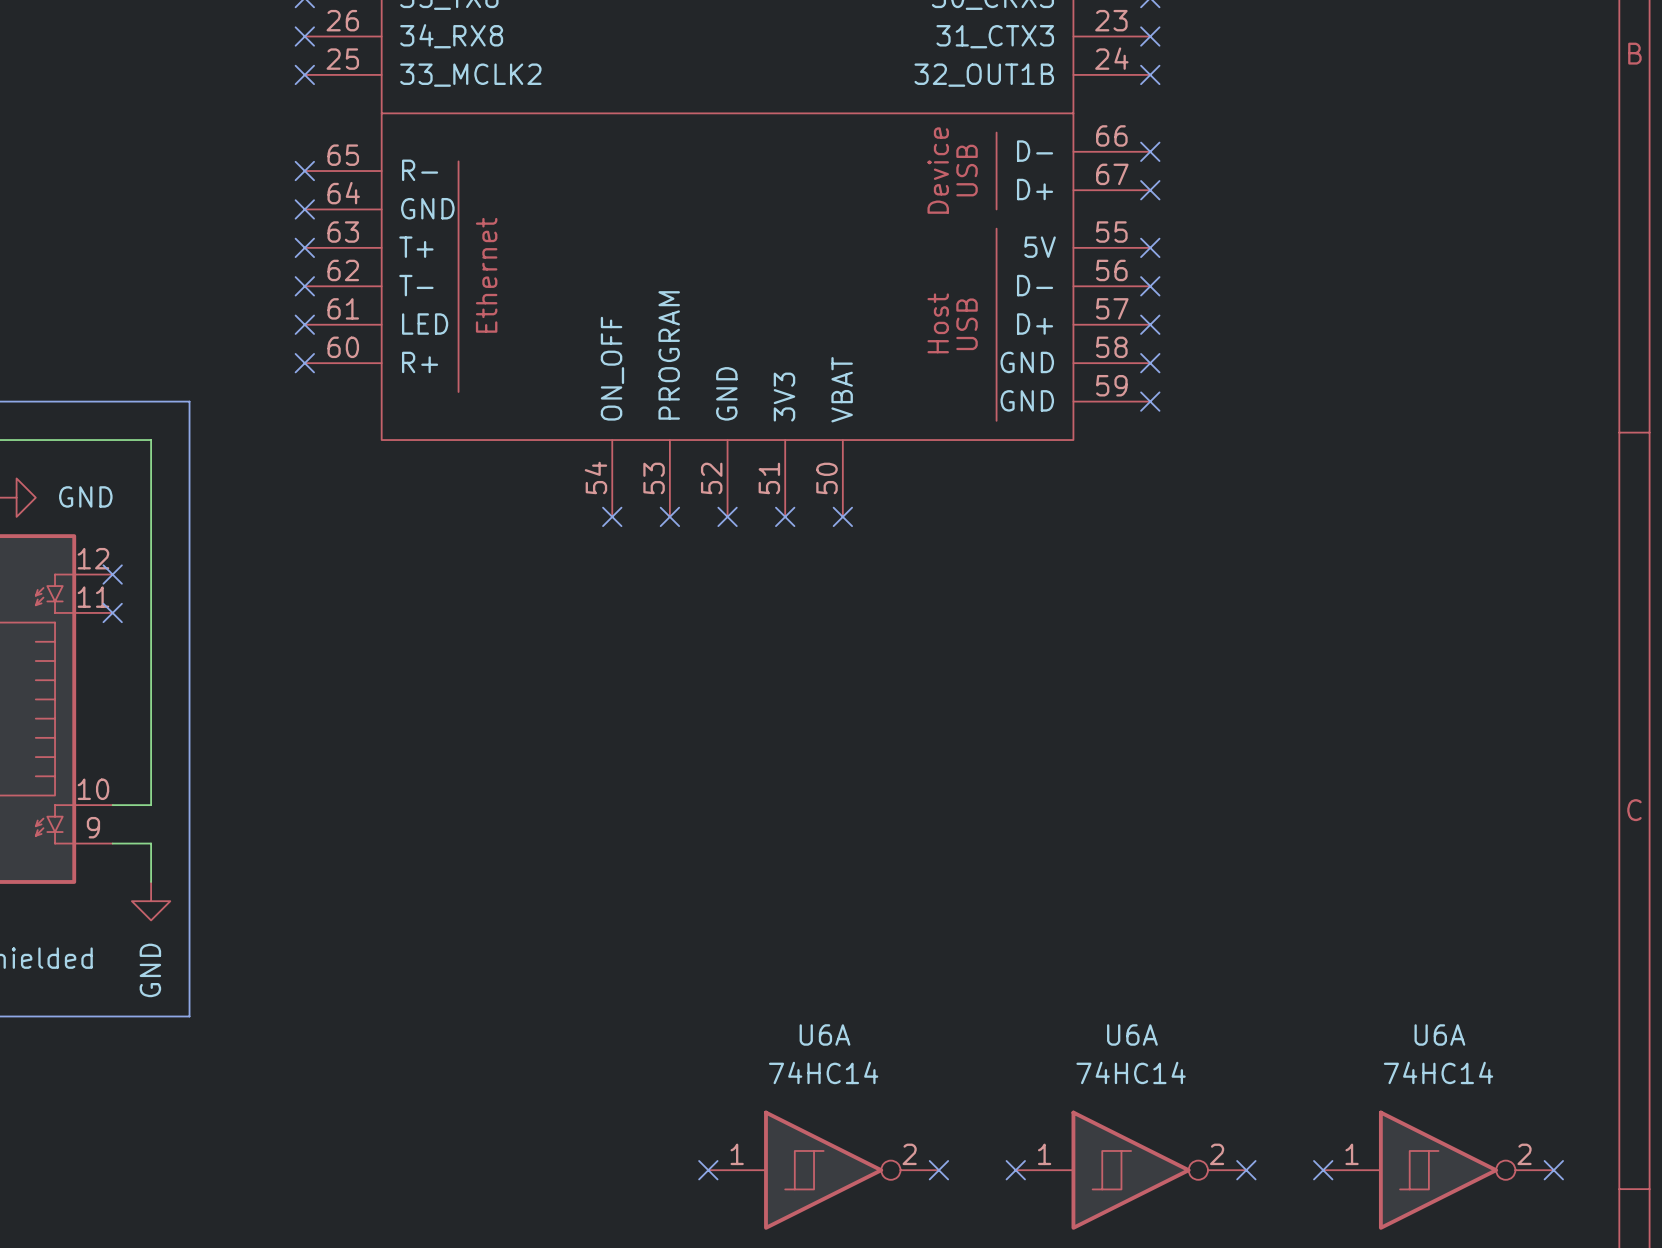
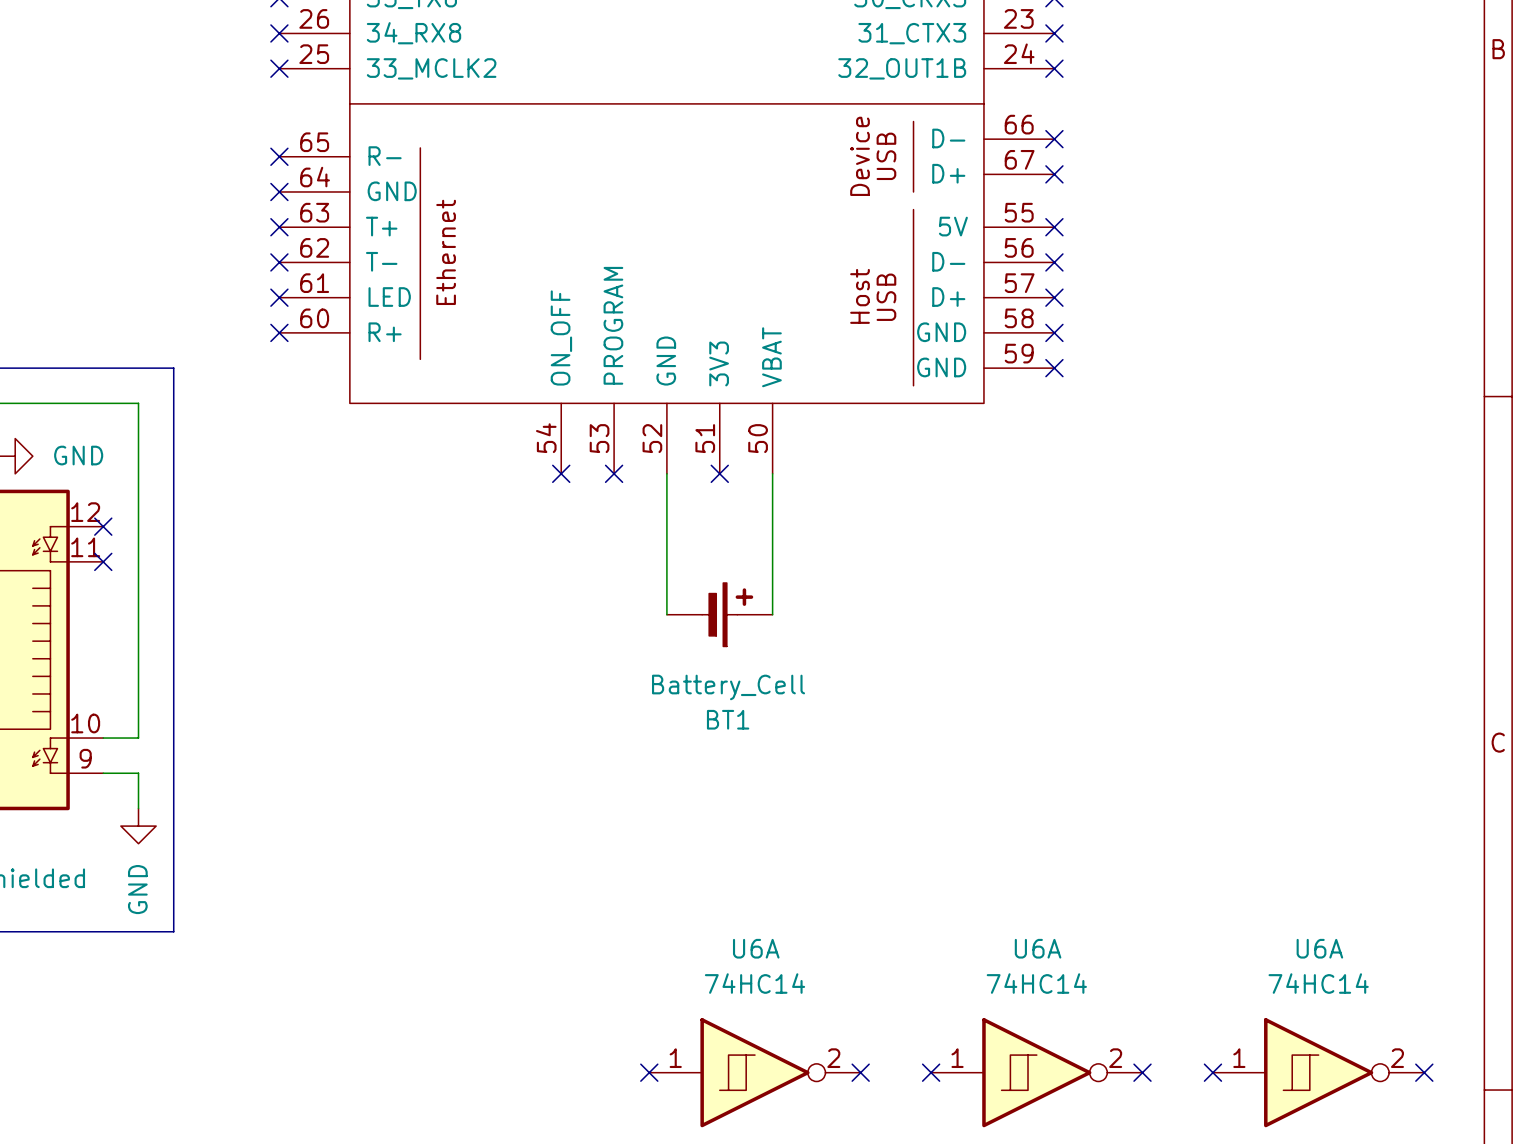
wire: none -> (666, 473) (666, 614)
no-connect mark: (727, 516) -> none
wire: none -> (772, 473) (772, 614)
no-connect mark: (842, 516) -> none
BT1: none -> Battery_Cell (719, 614)

